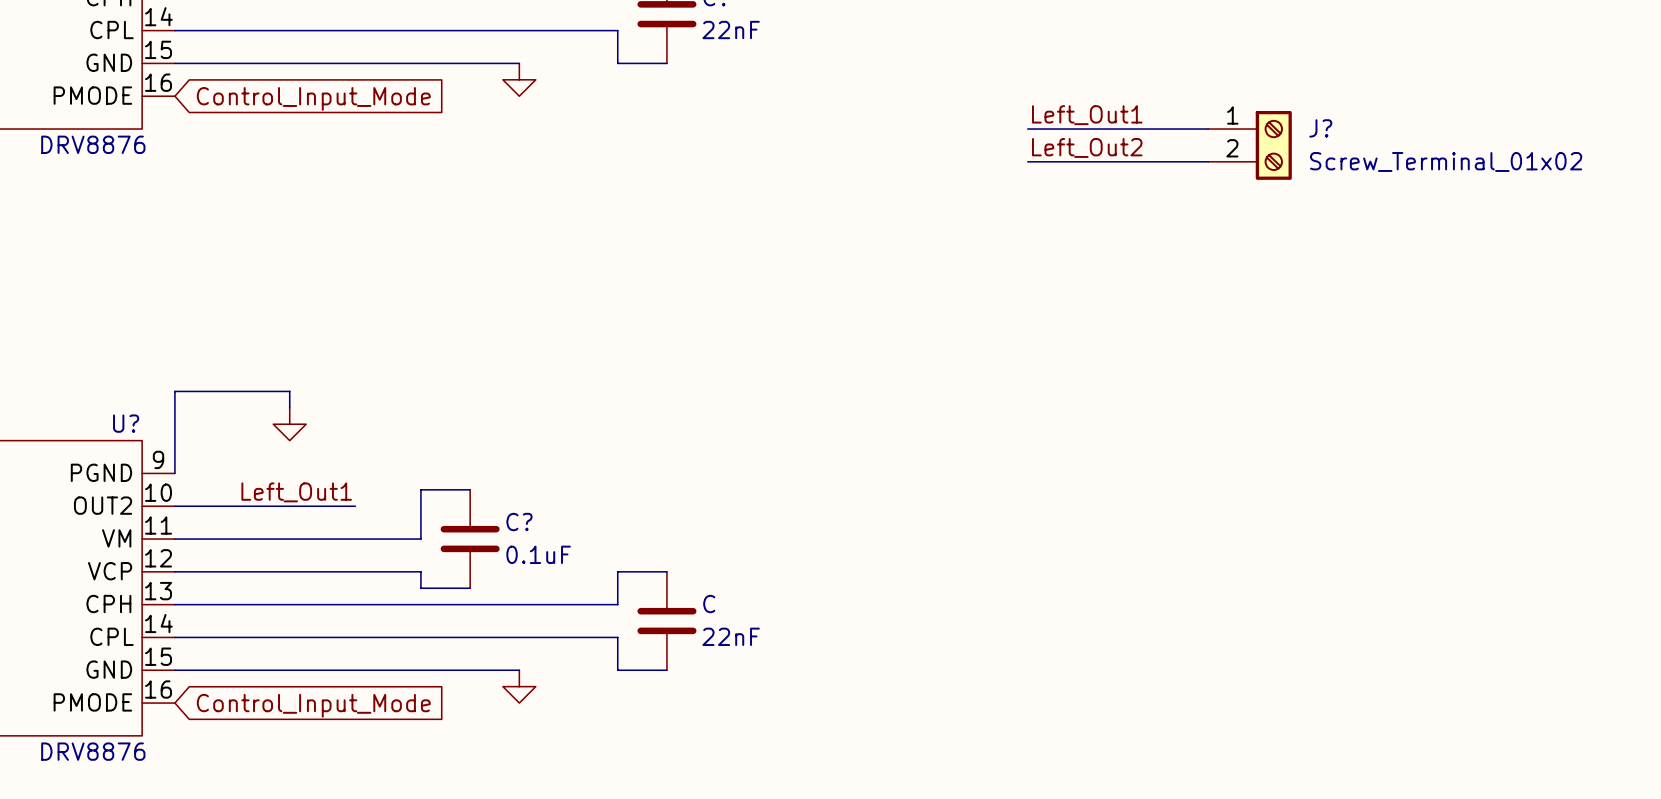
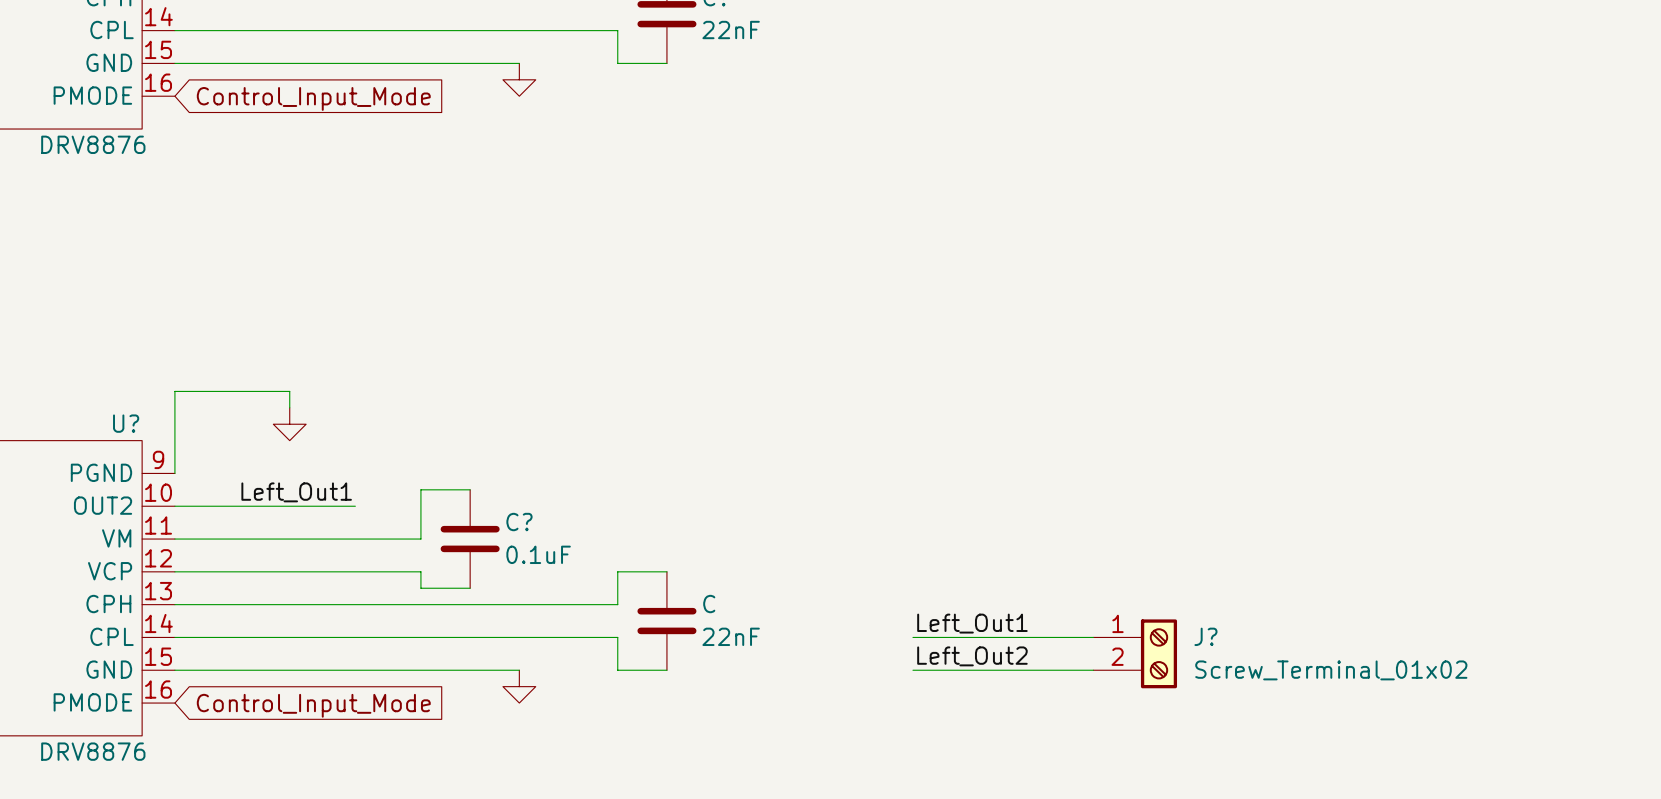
label: Left_Out1 (1087, 115) -> none
wire: (1027, 129) (1208, 129) -> none
J?: Screw_Terminal_01x02 (1250, 145) -> none
label: Left_Out2 (1087, 147) -> none
wire: (1027, 161) (1208, 161) -> none
label: none -> Left_Out1 (972, 623)
wire: none -> (912, 637) (1093, 637)
J?: none -> Screw_Terminal_01x02 (1135, 653)
label: none -> Left_Out2 (972, 656)
wire: none -> (912, 670) (1093, 670)

